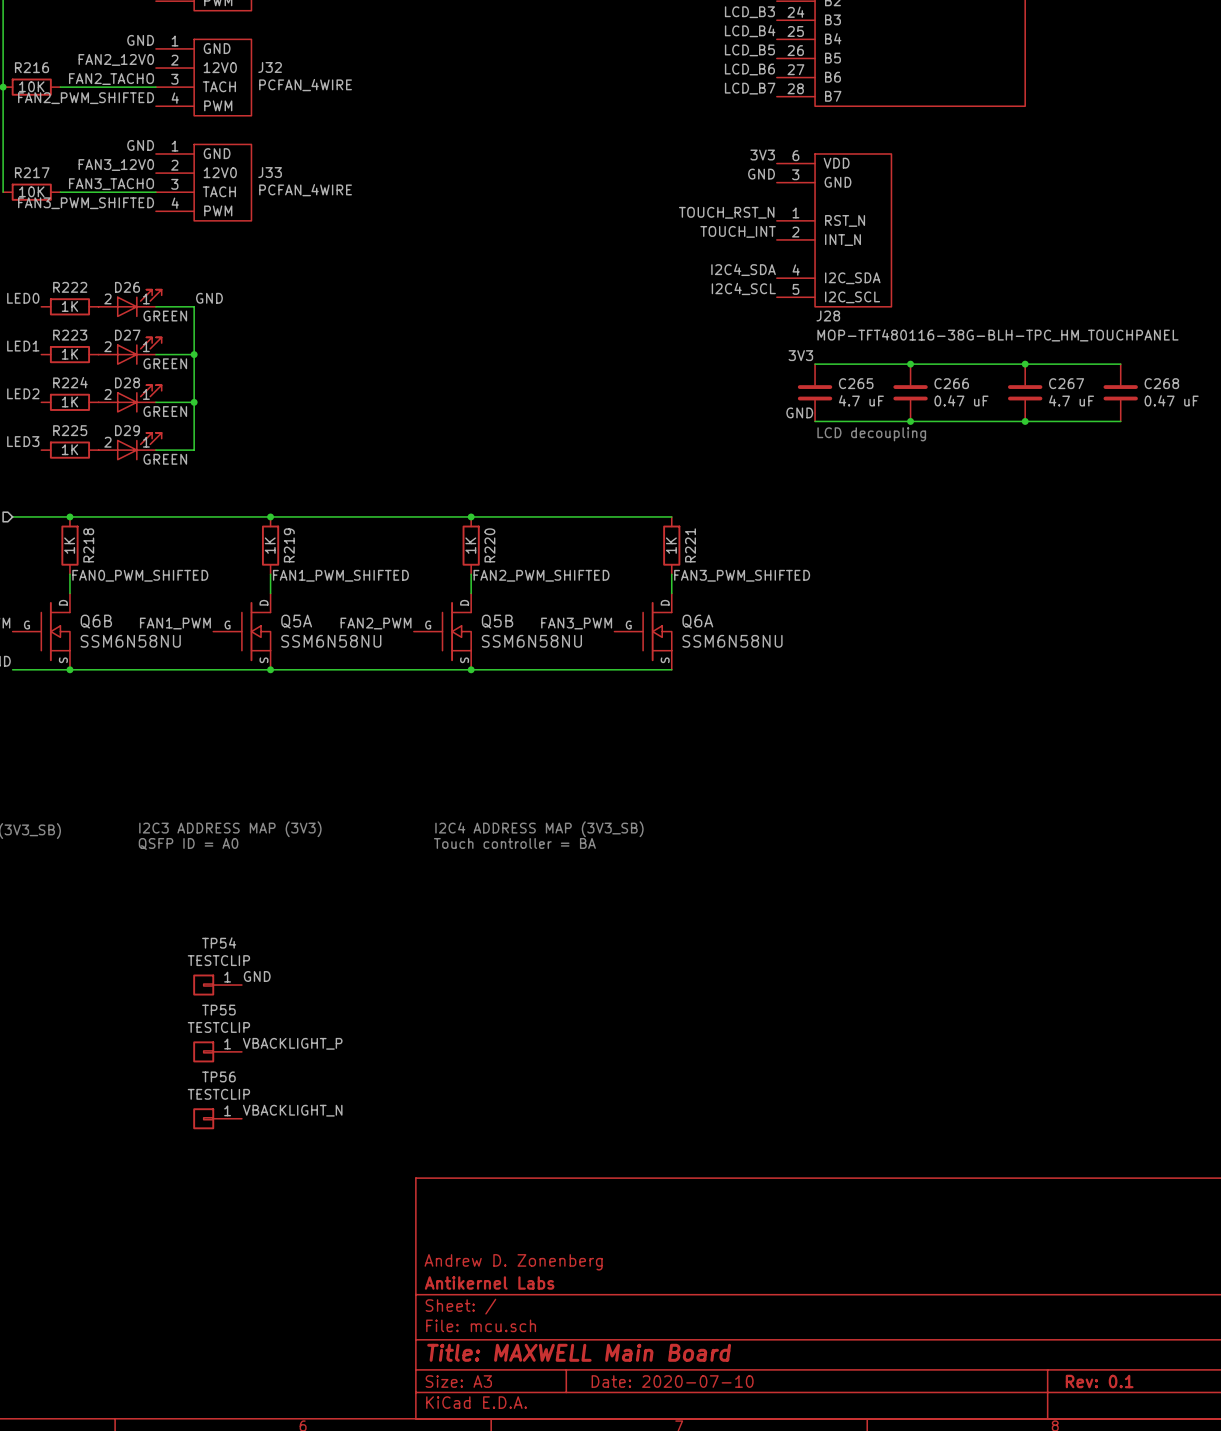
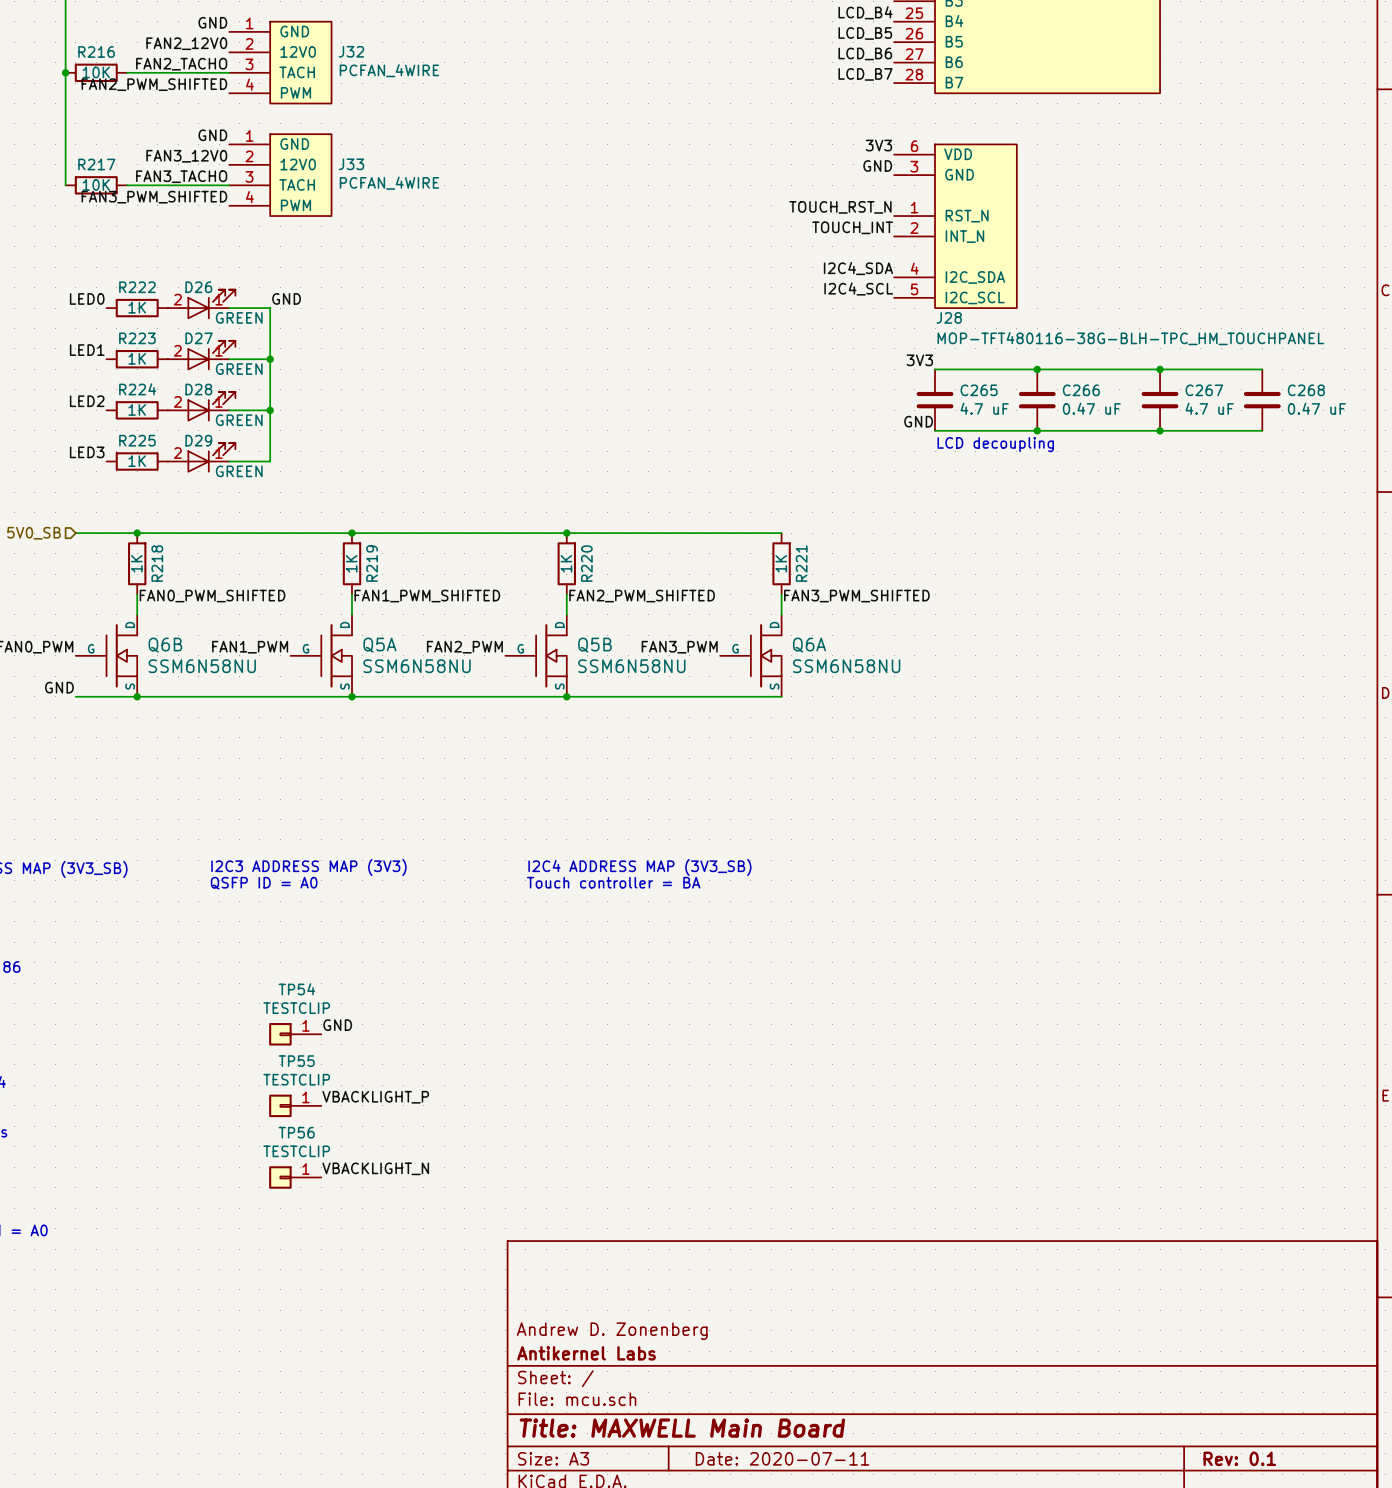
title block: Date: 2020-07-10 (672, 1381) -> Date: 2020-07-11 (782, 1458)

